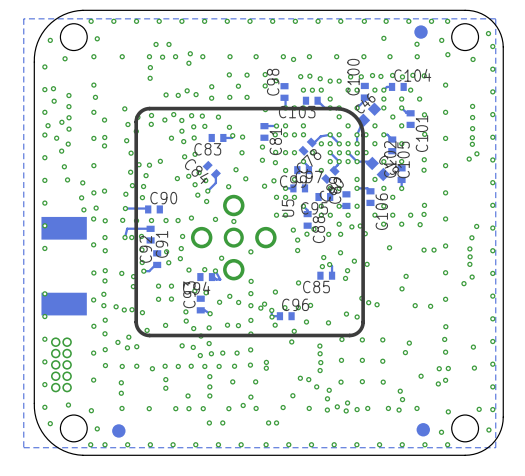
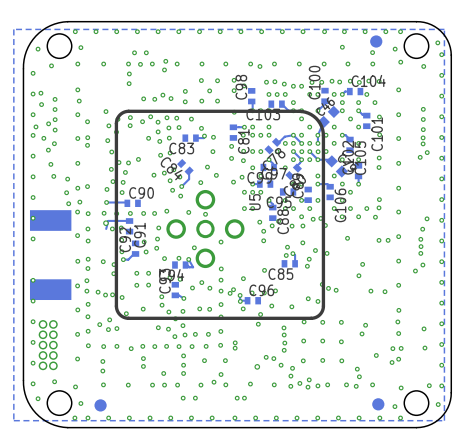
via: none -> (105, 223)
via: (125, 237) -> none
via: none -> (257, 366)
via: (292, 395) -> none

